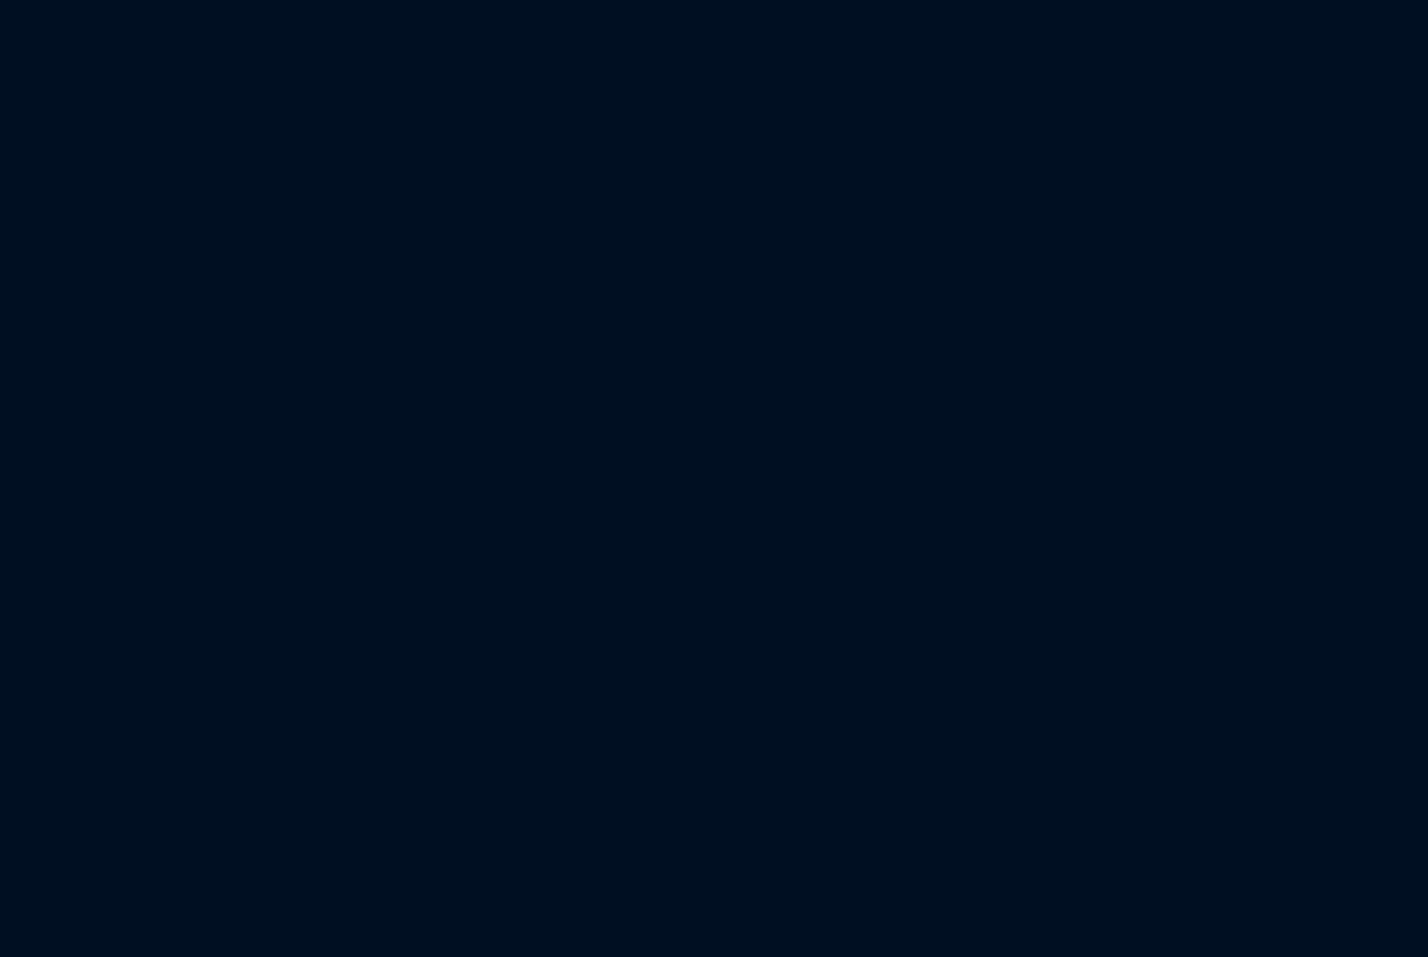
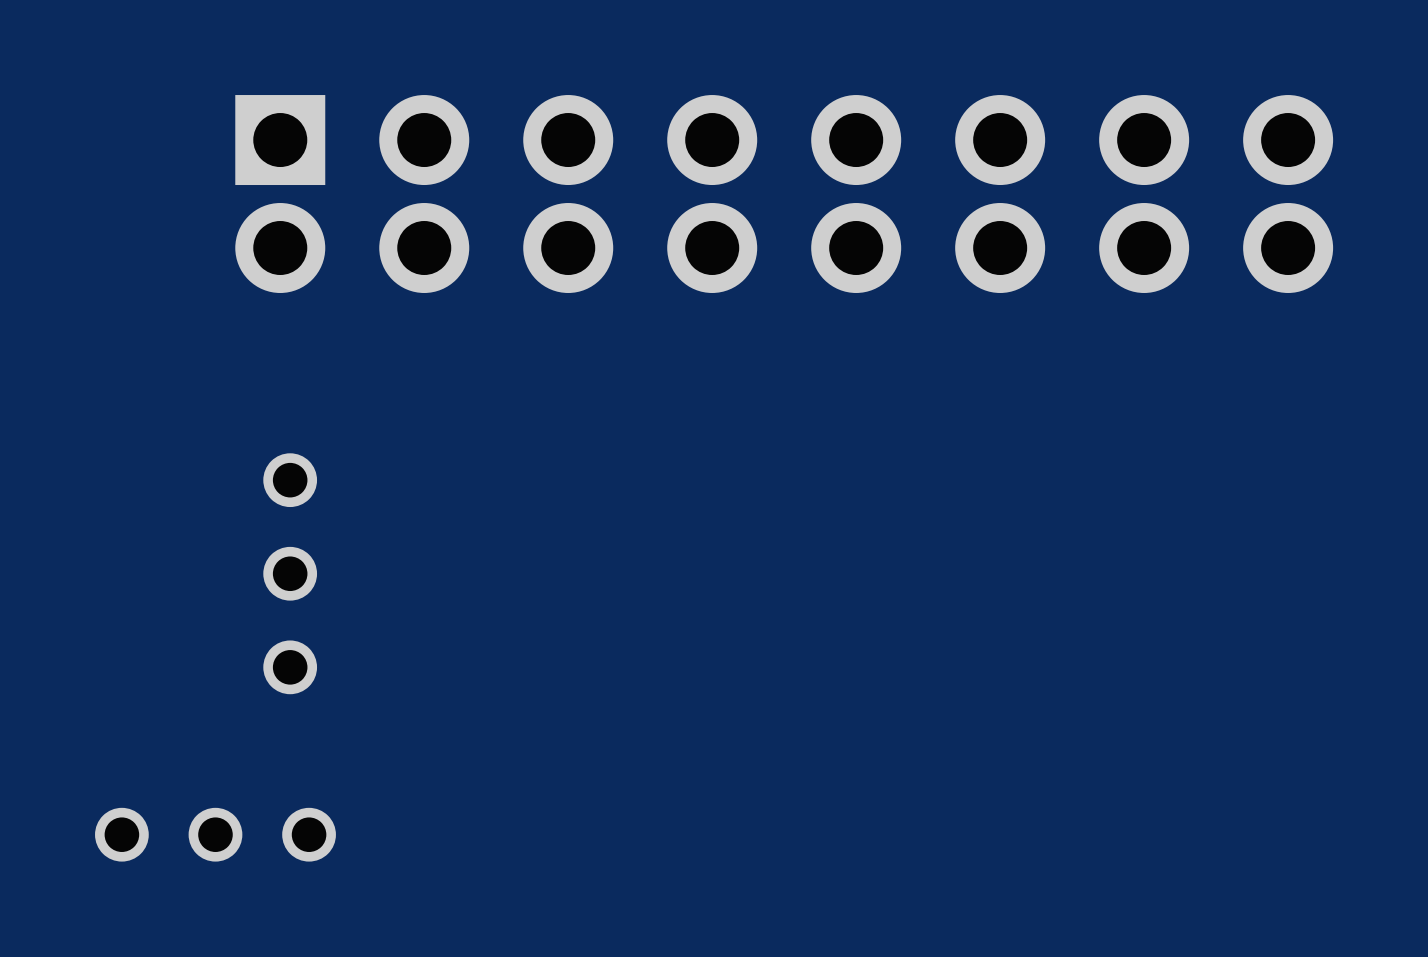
part: none -> (784, 194)
part: none -> (290, 573)
part: none -> (215, 834)

